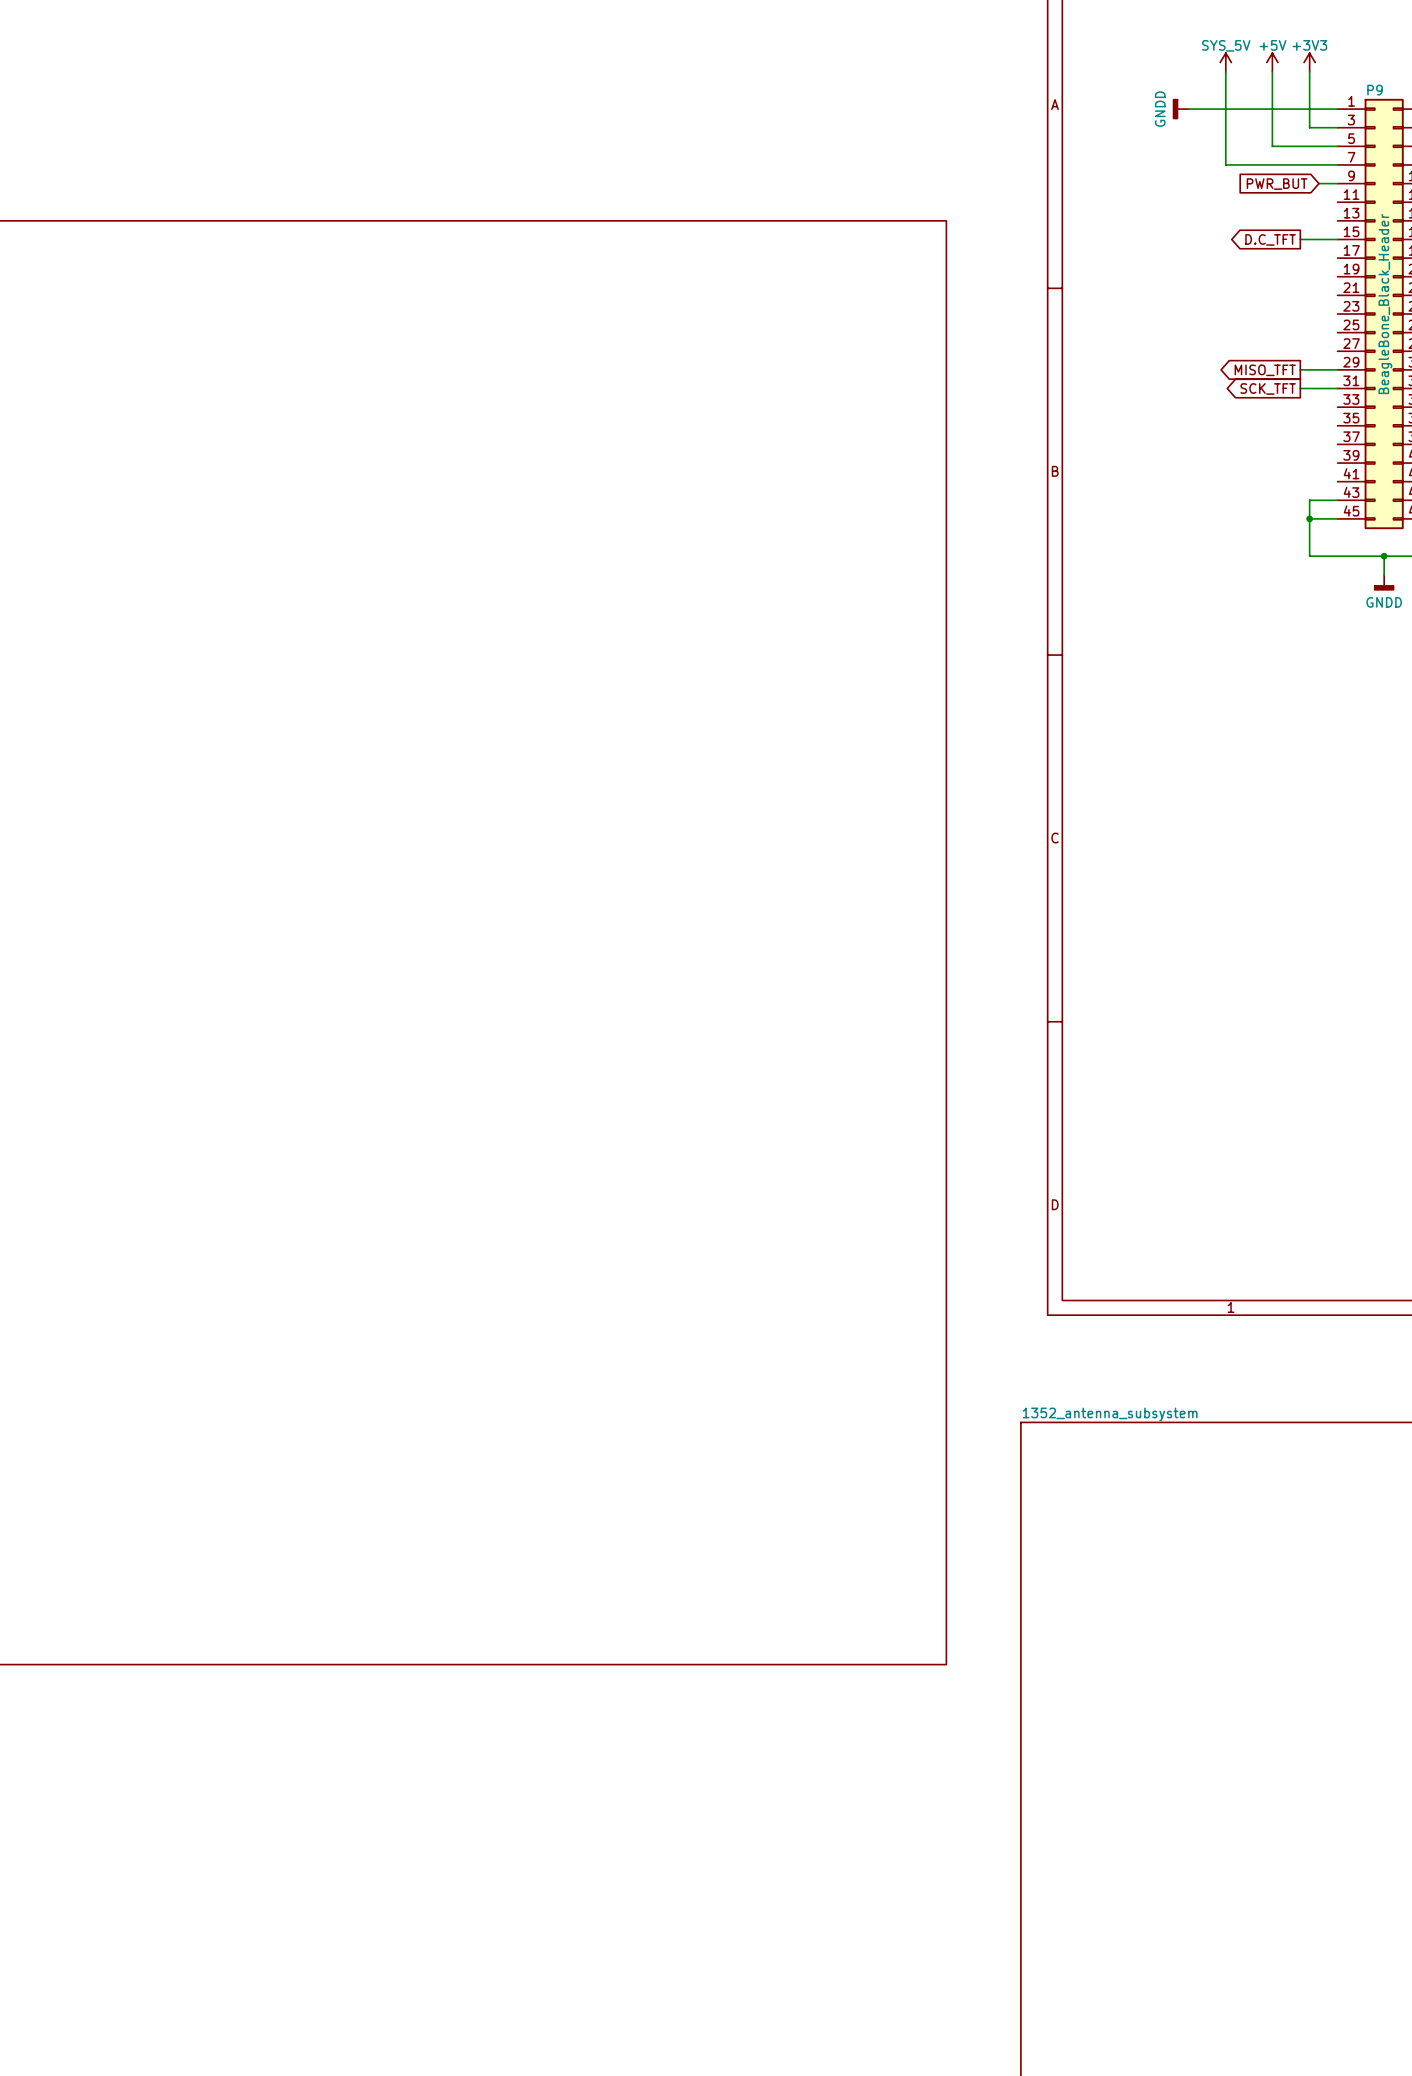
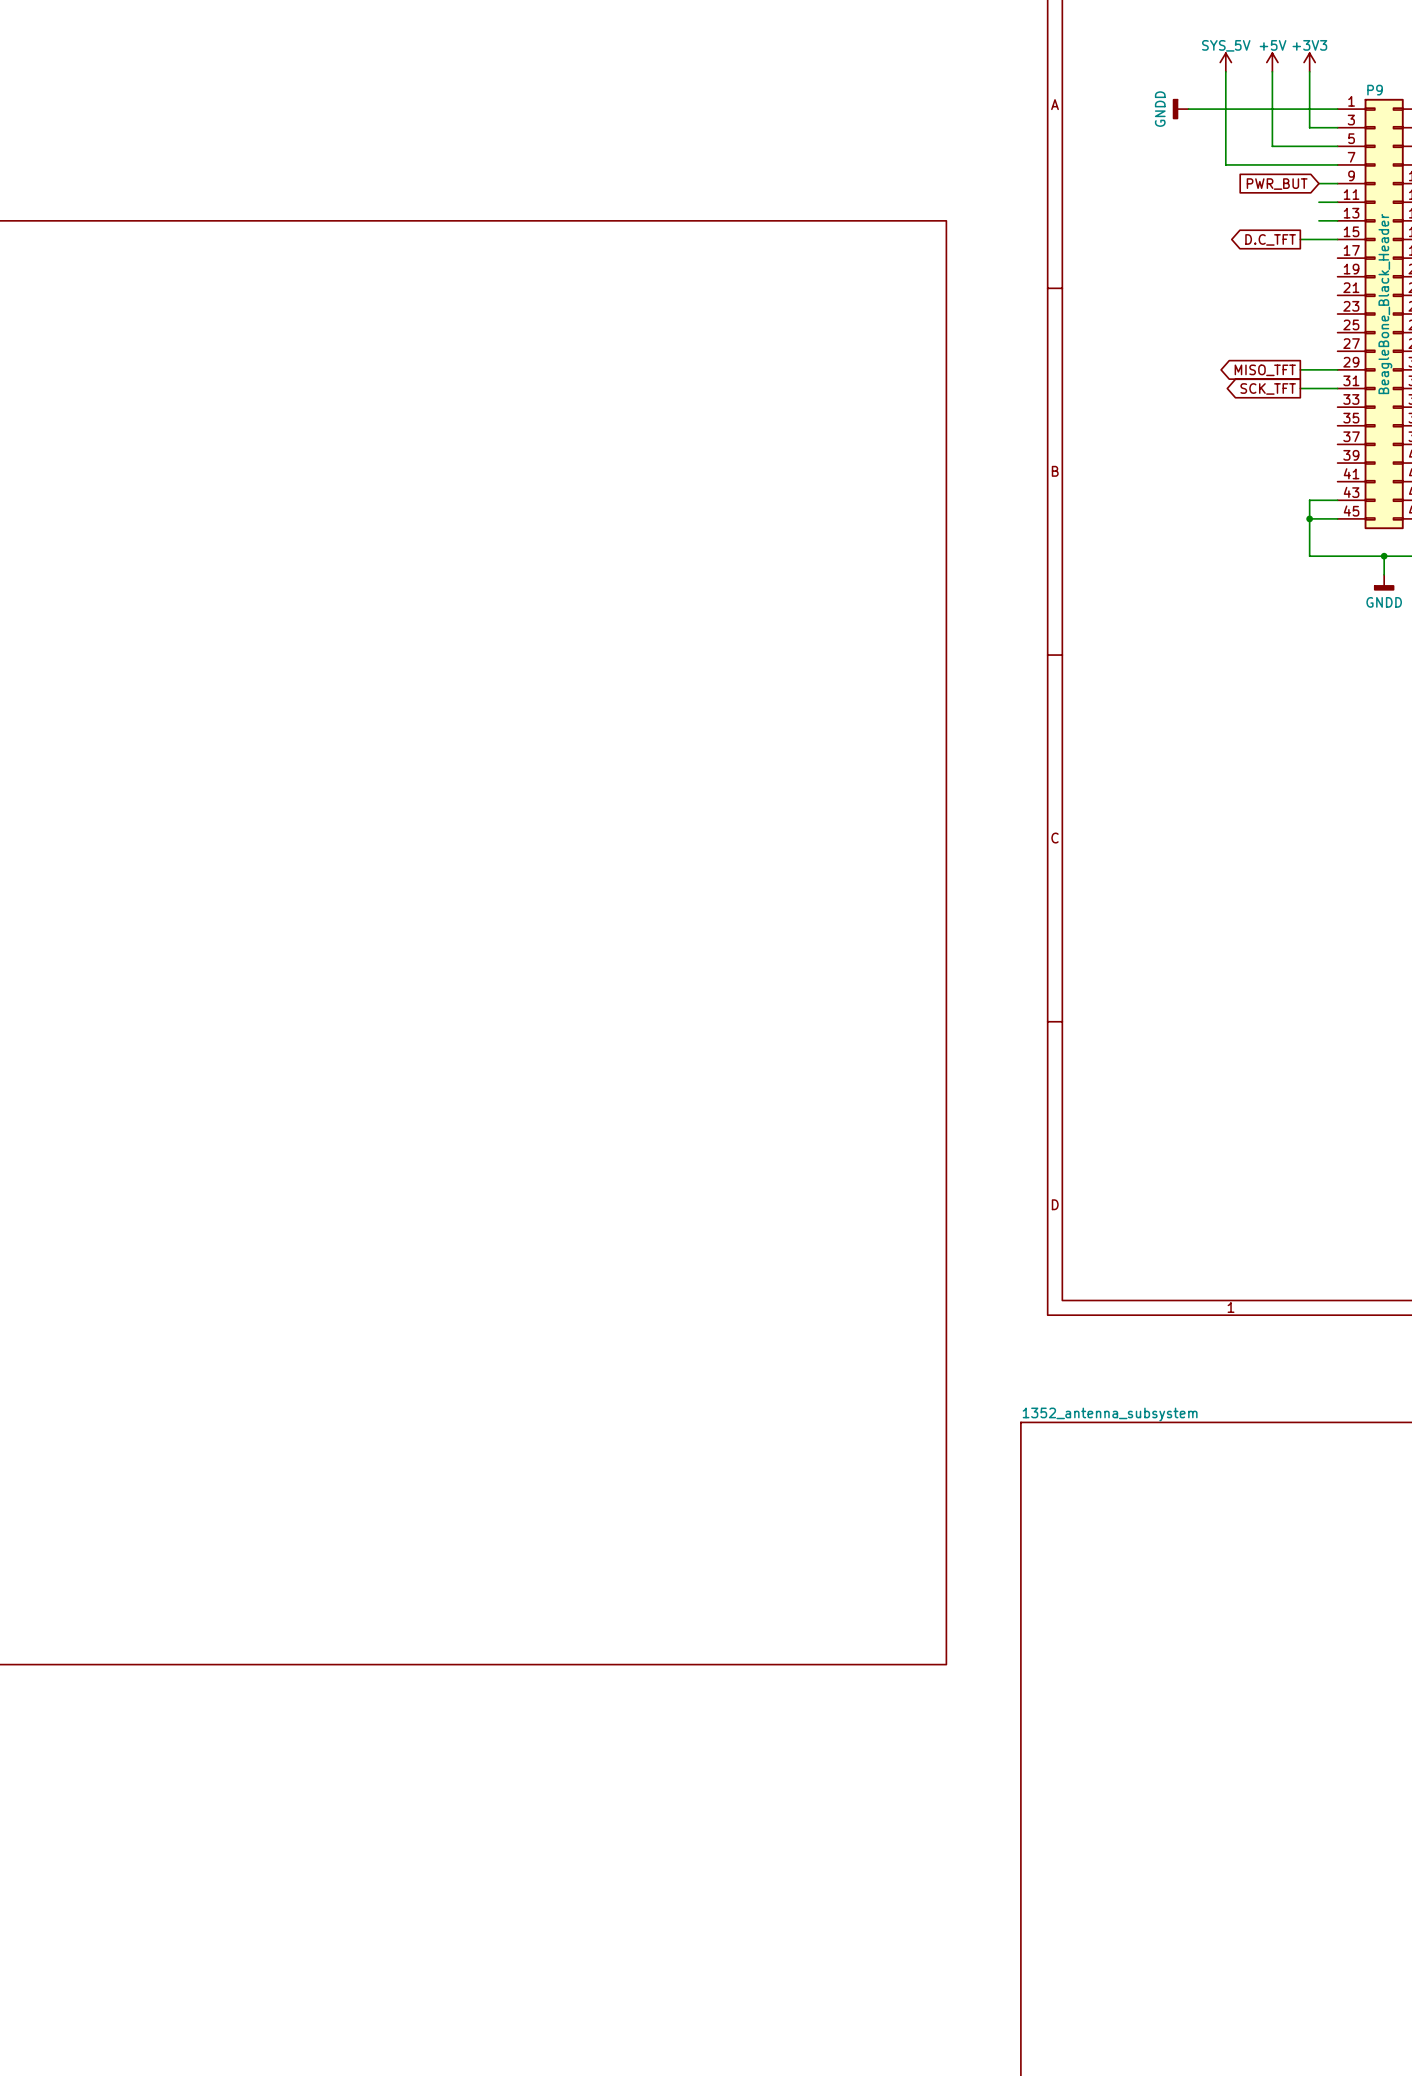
wire: none -> (1318, 202) (1337, 202)
wire: none -> (1318, 220) (1337, 220)

